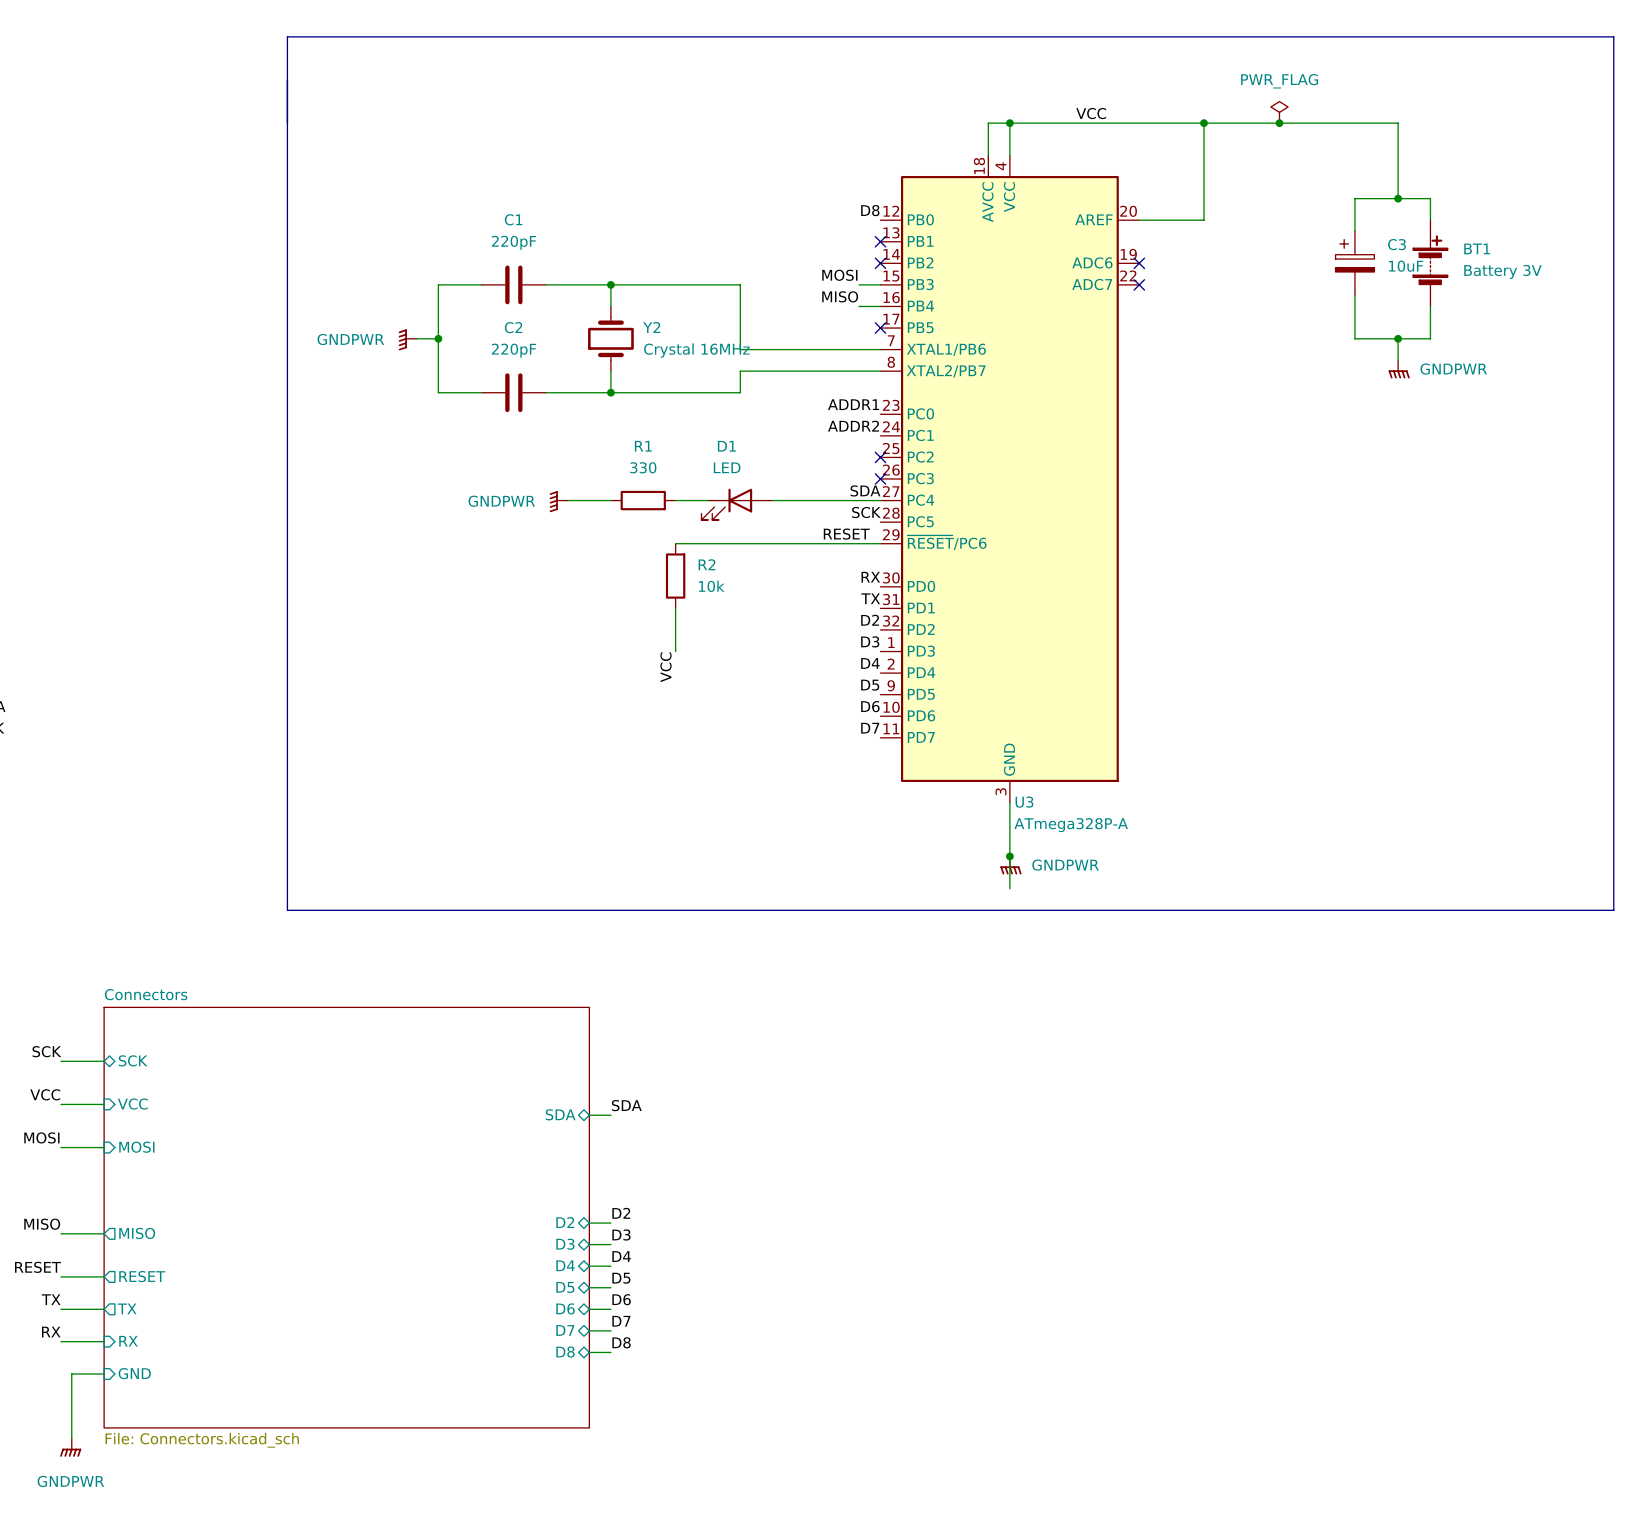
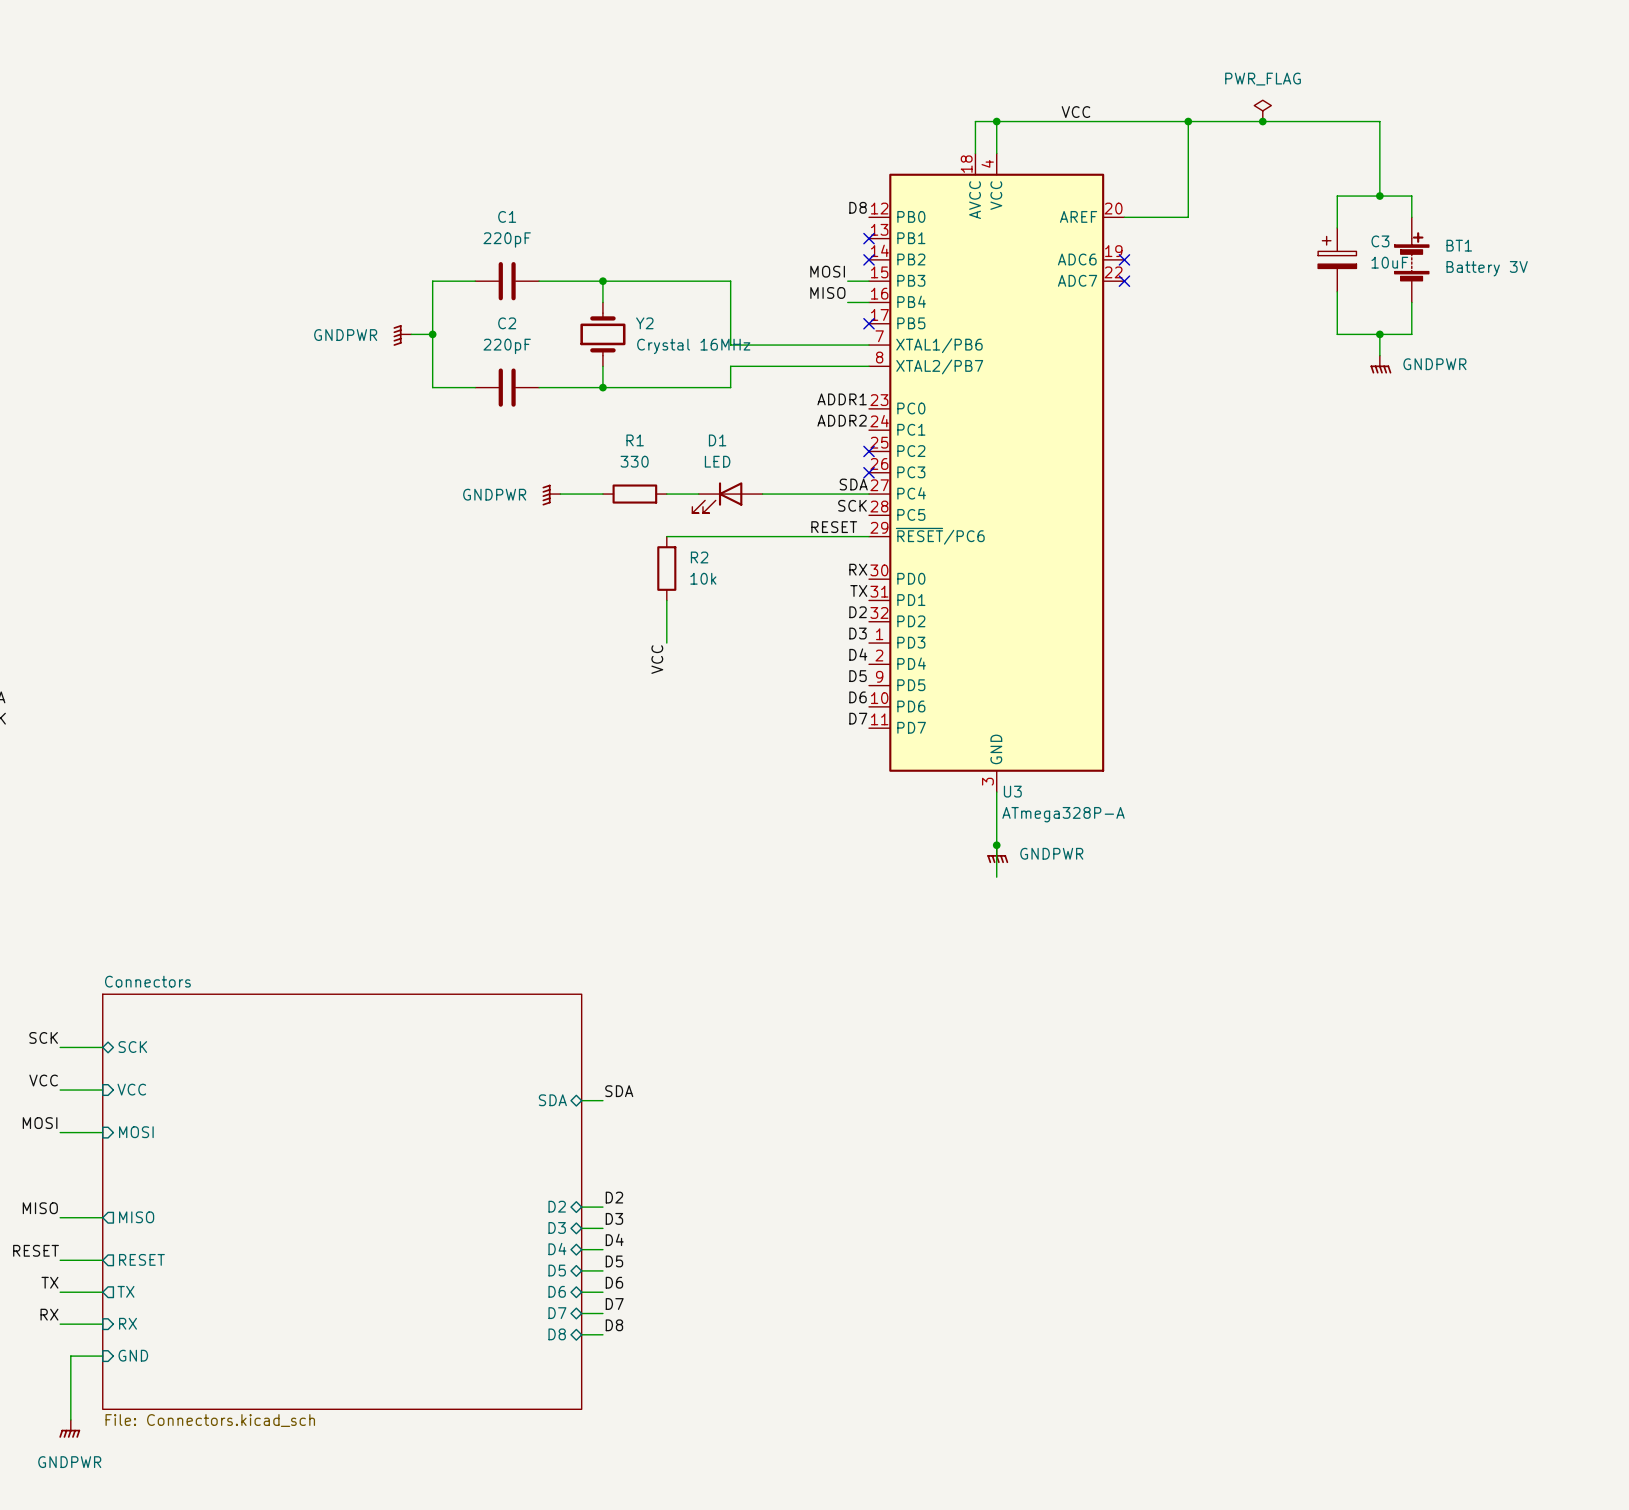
line: (287, 36) (287, 910) (1613, 910) (1613, 36) (287, 36) -> none

